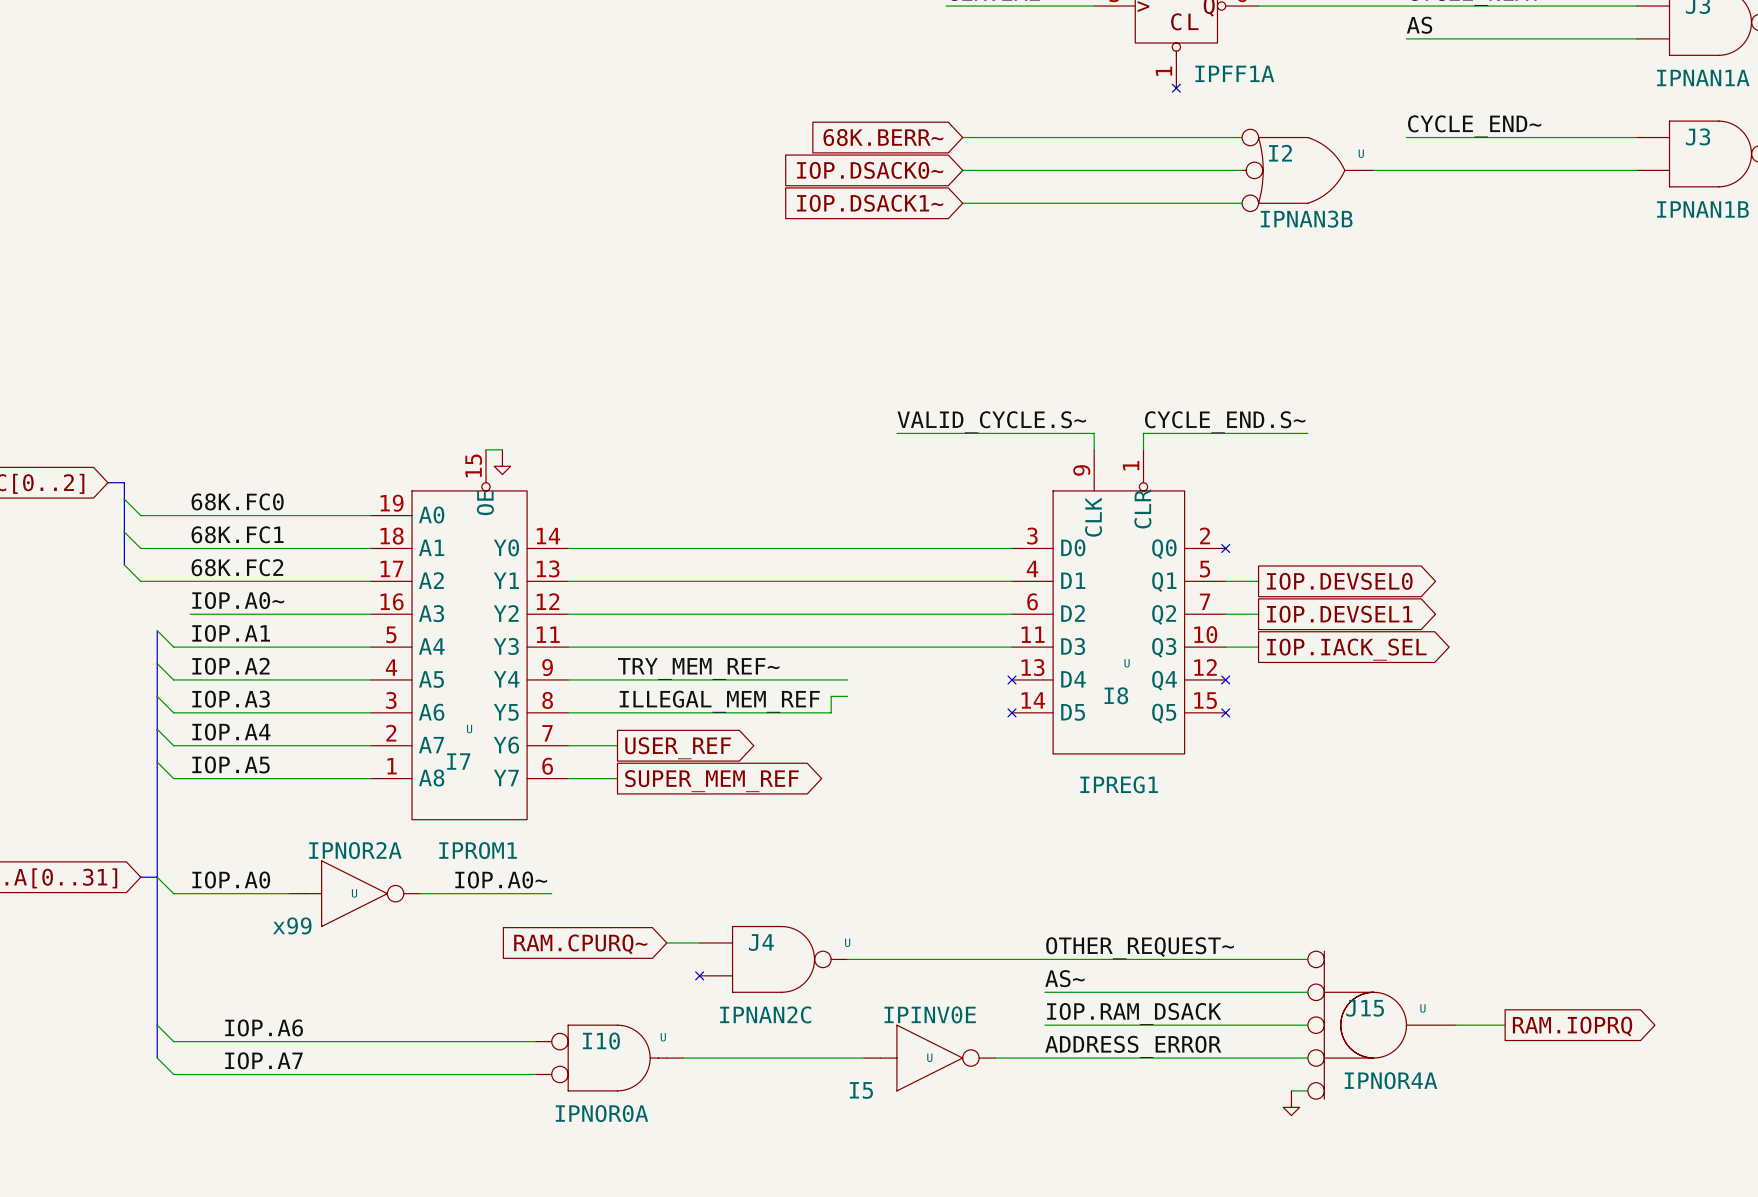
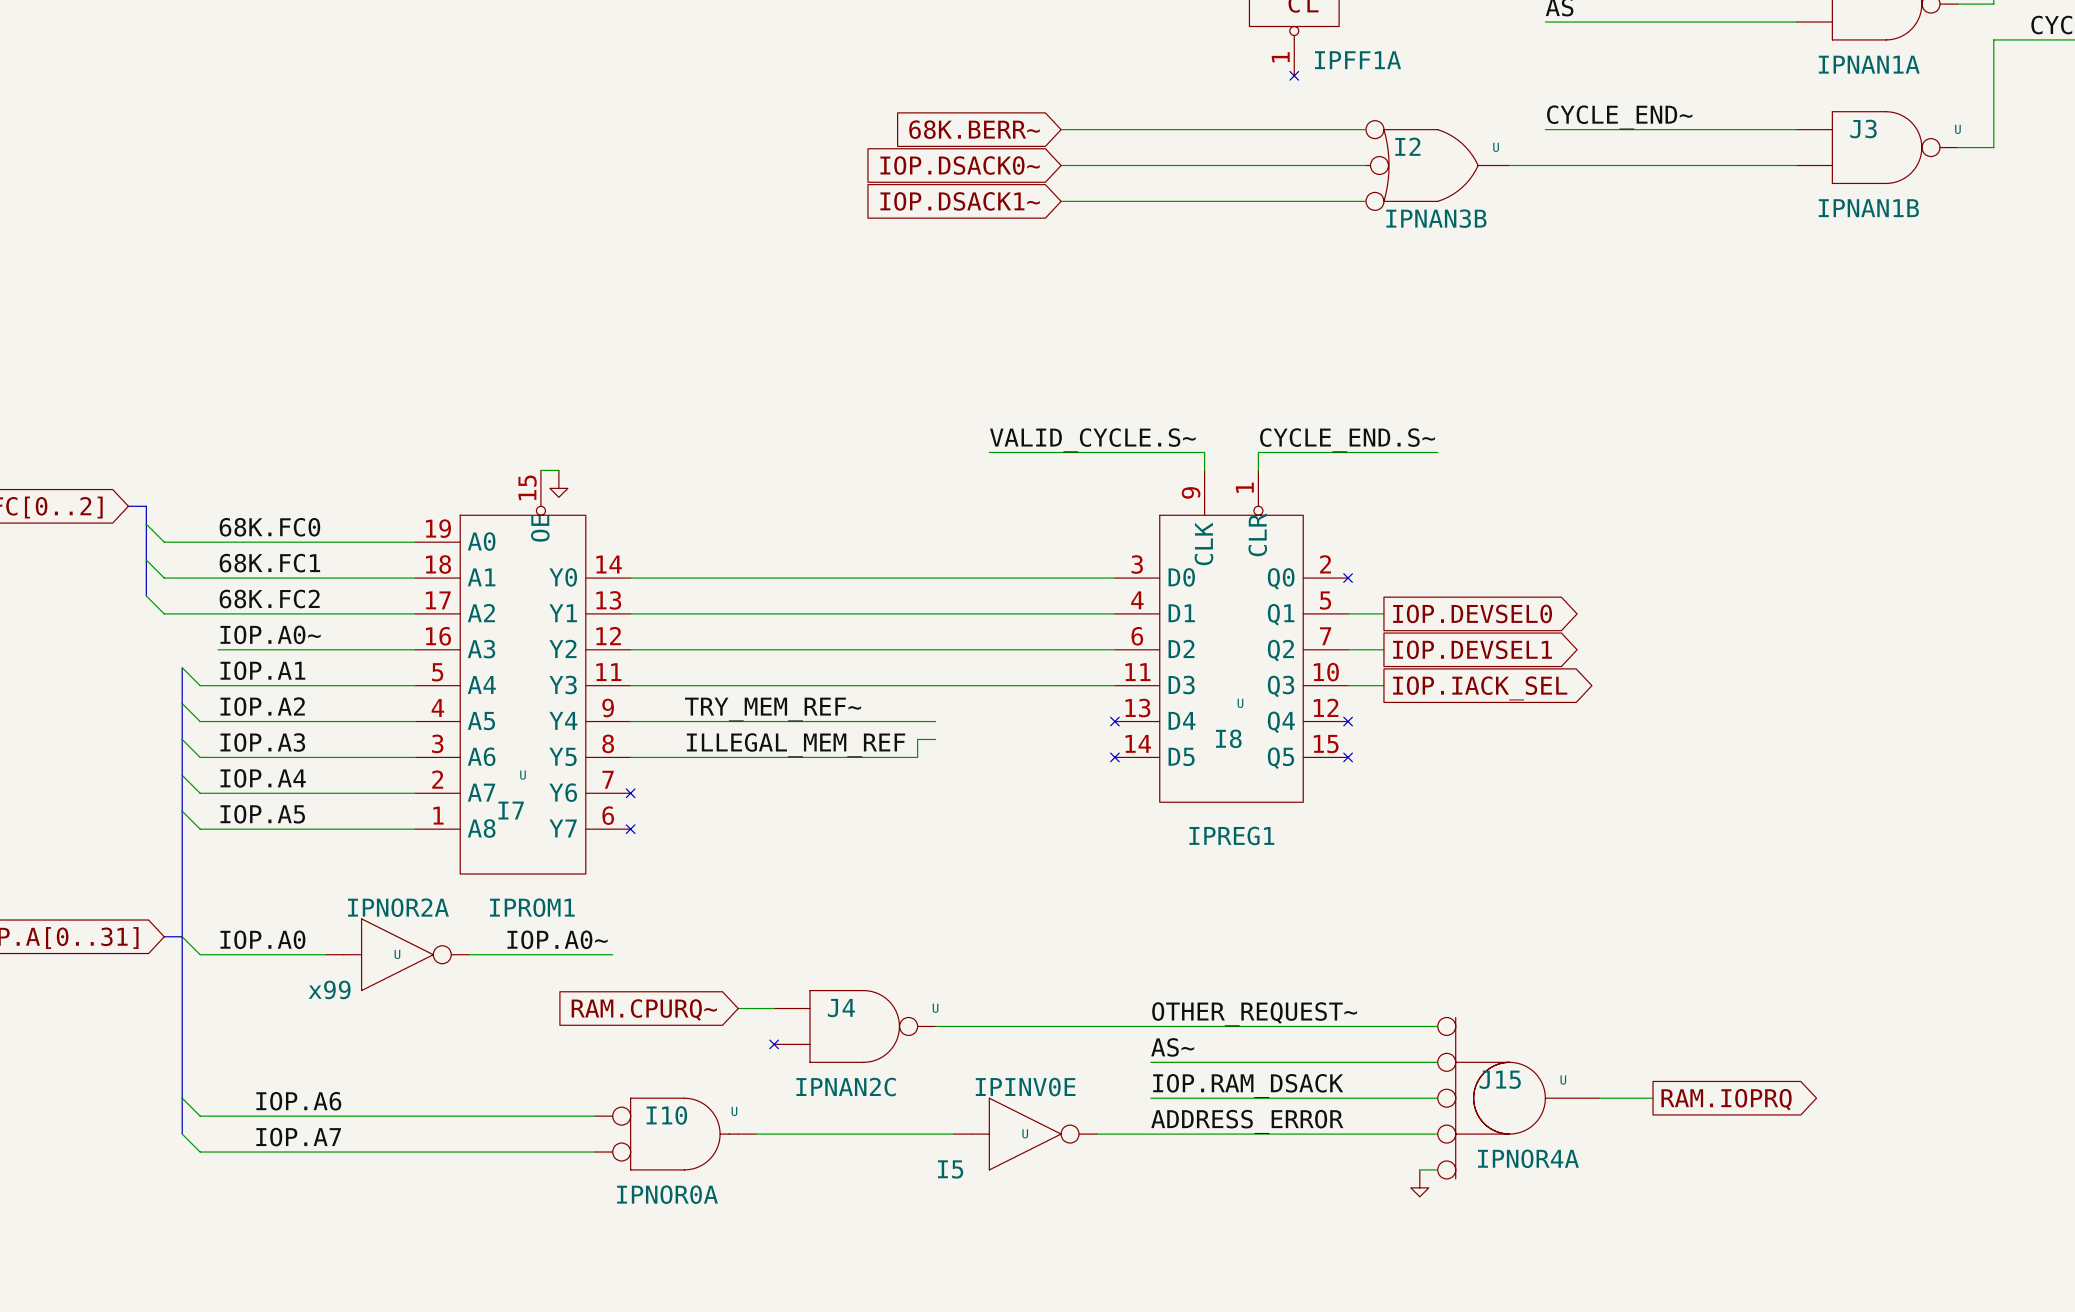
wire: (568, 745) (617, 745) -> none
no-connect mark: none -> (630, 793)
global label: USER_REF (678, 748) -> none
wire: (568, 778) (617, 778) -> none
no-connect mark: none -> (630, 829)
global label: SUPER_MEM_REF (711, 781) -> none

